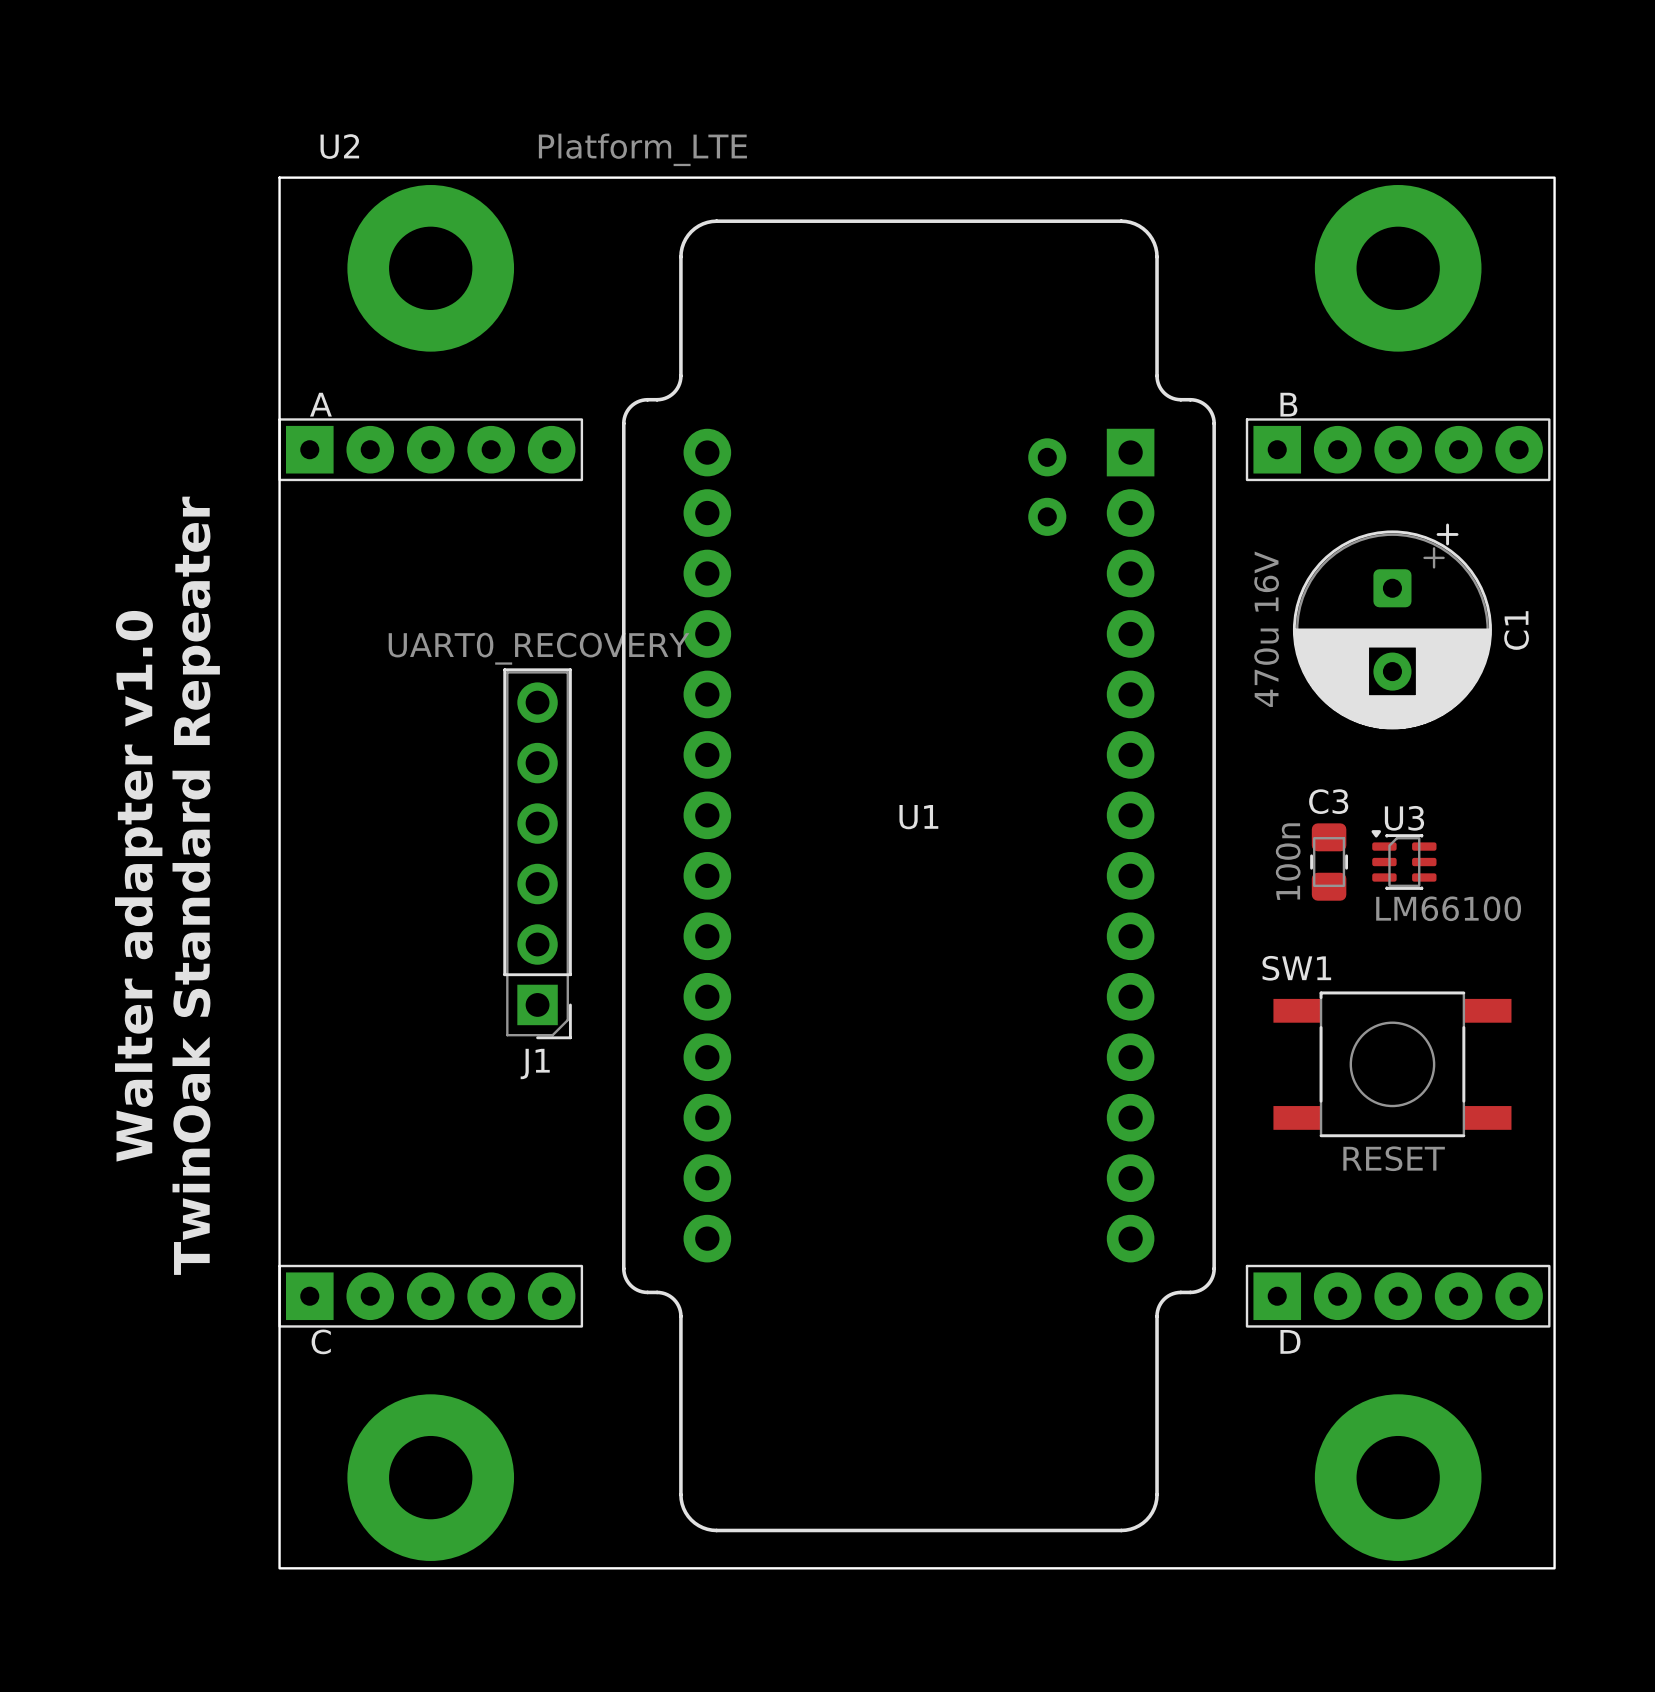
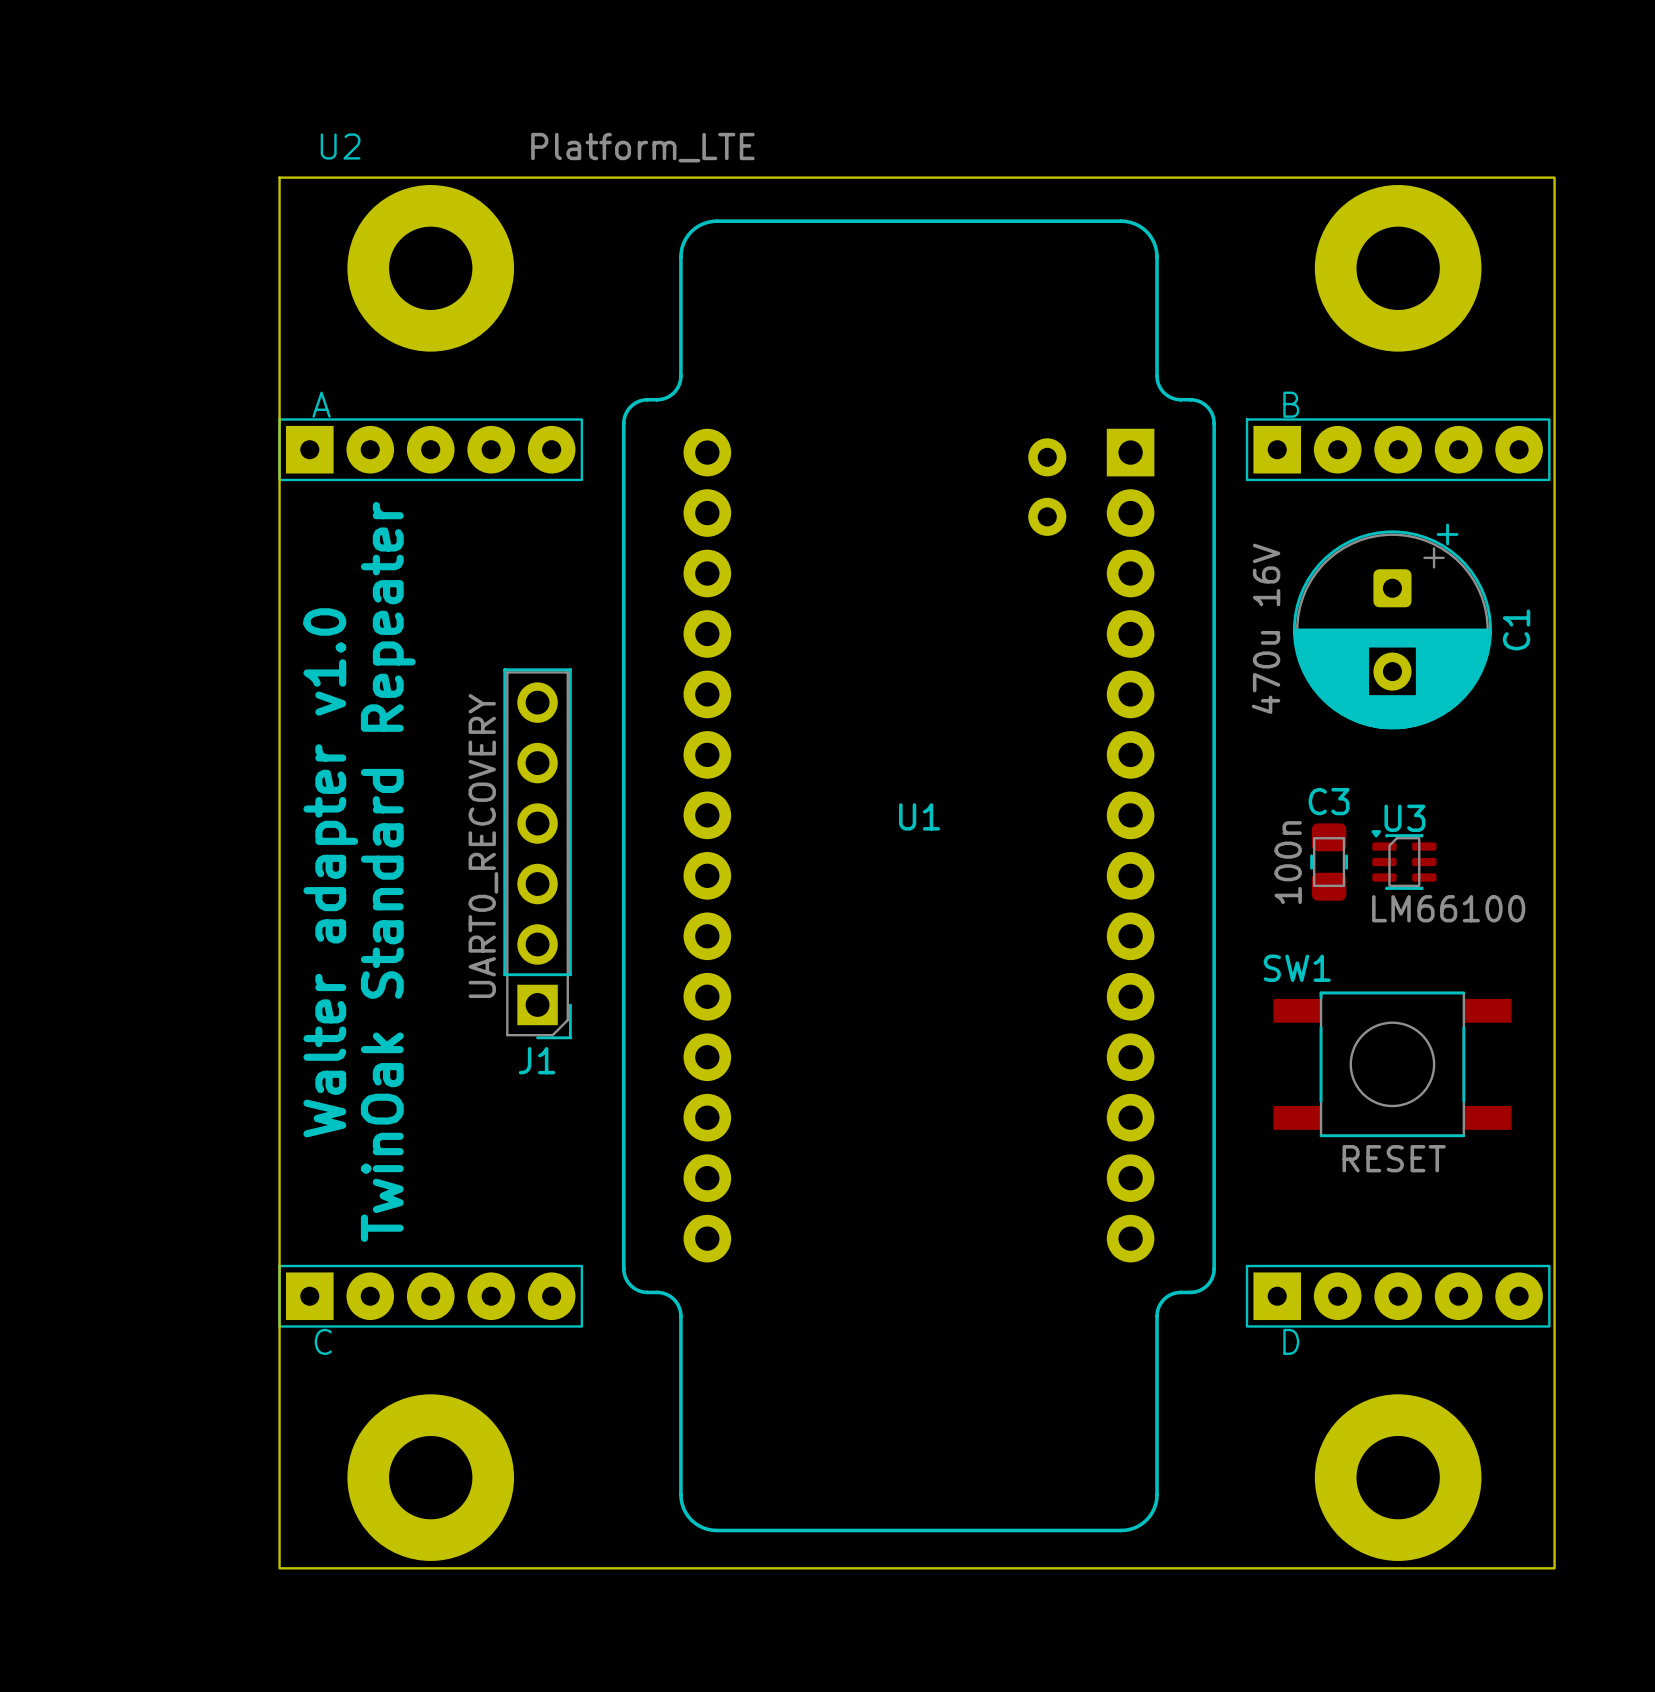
J1 value rotation: 0° (539, 648) -> 90° counterclockwise (483, 846)
text position: TwinOak Standard Repeater (196, 885) -> TwinOak Standard Repeater (388, 871)
text position: Walter adapter v1.0 (138, 886) -> Walter adapter v1.0 (330, 872)

